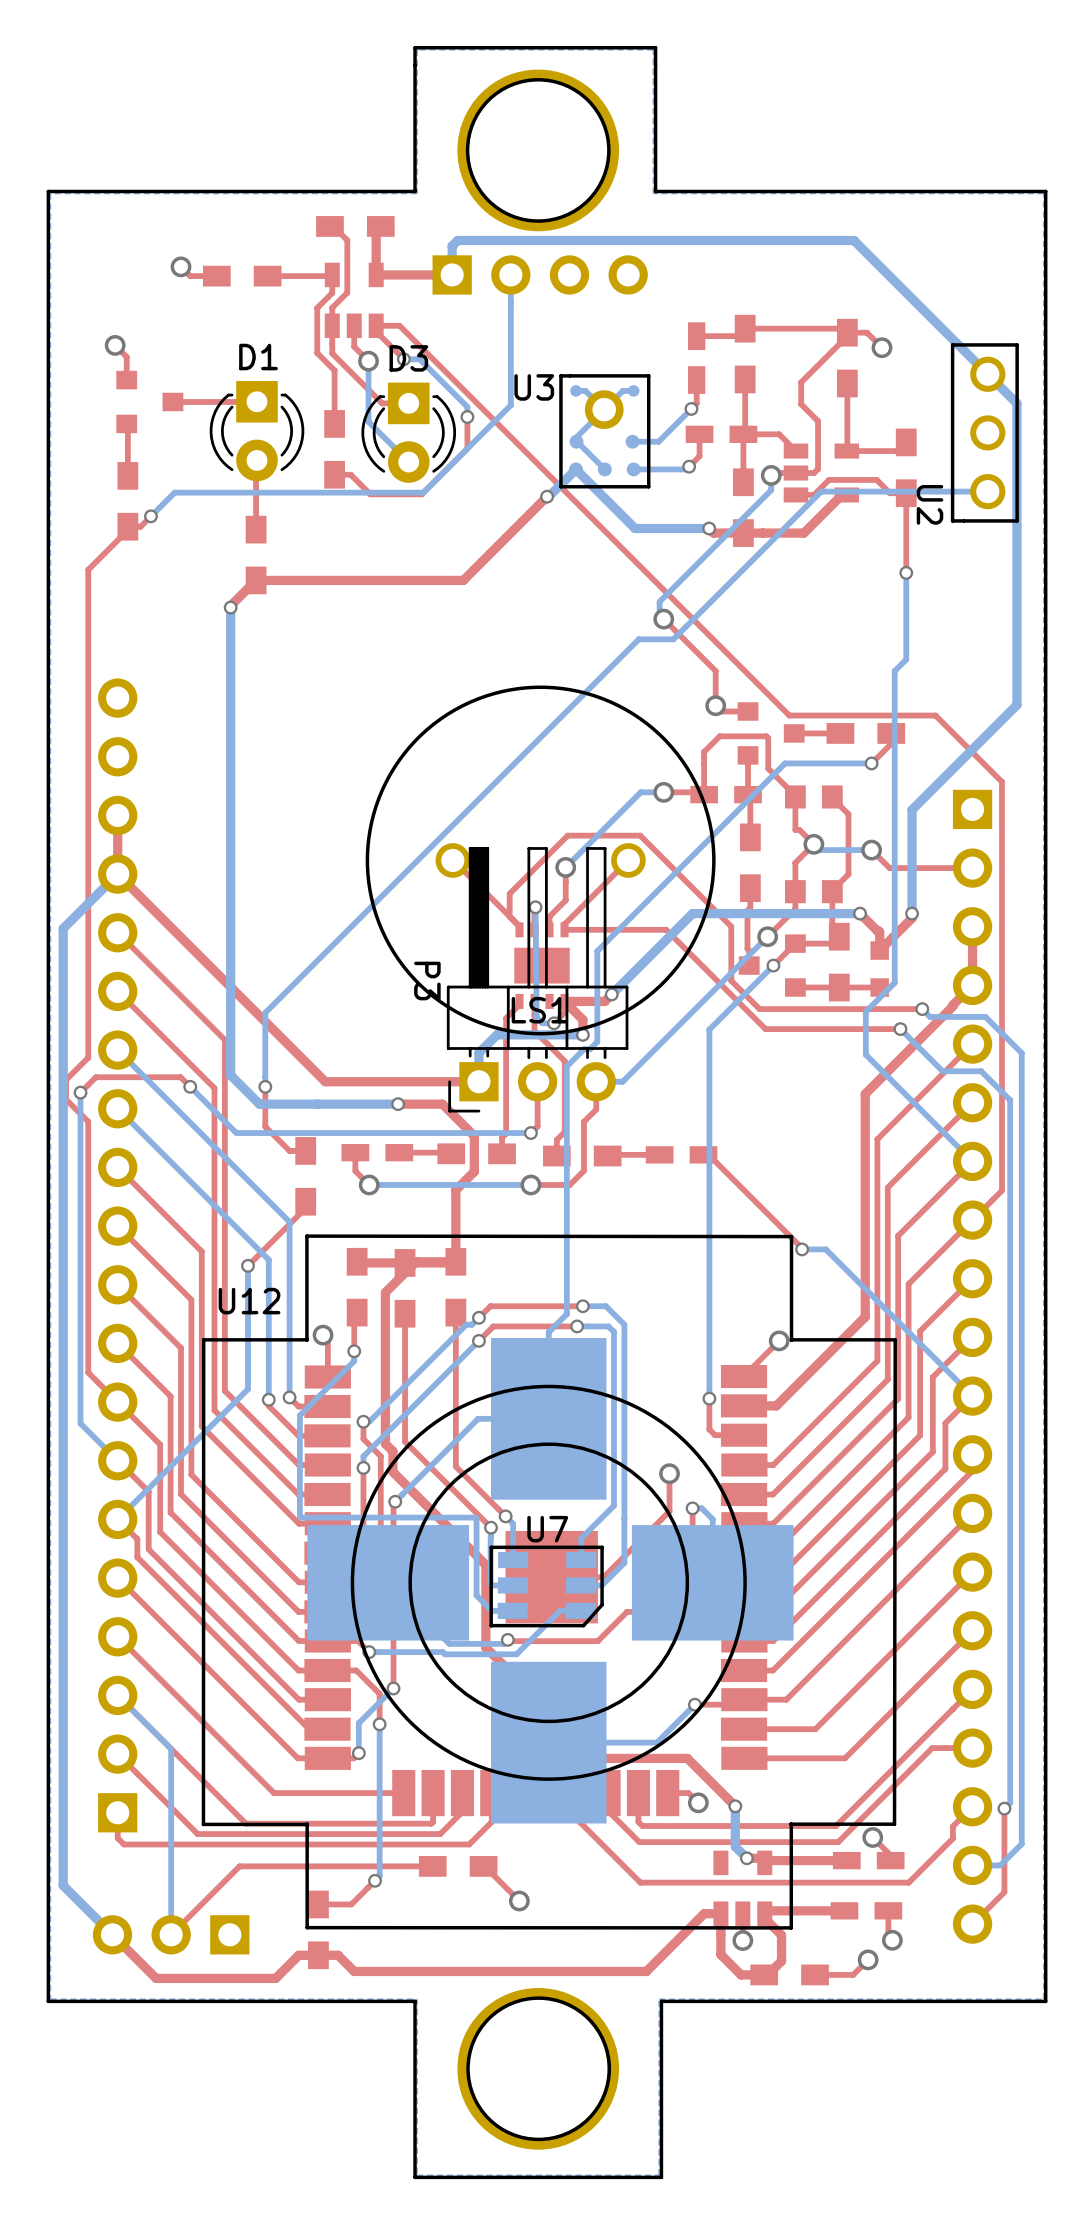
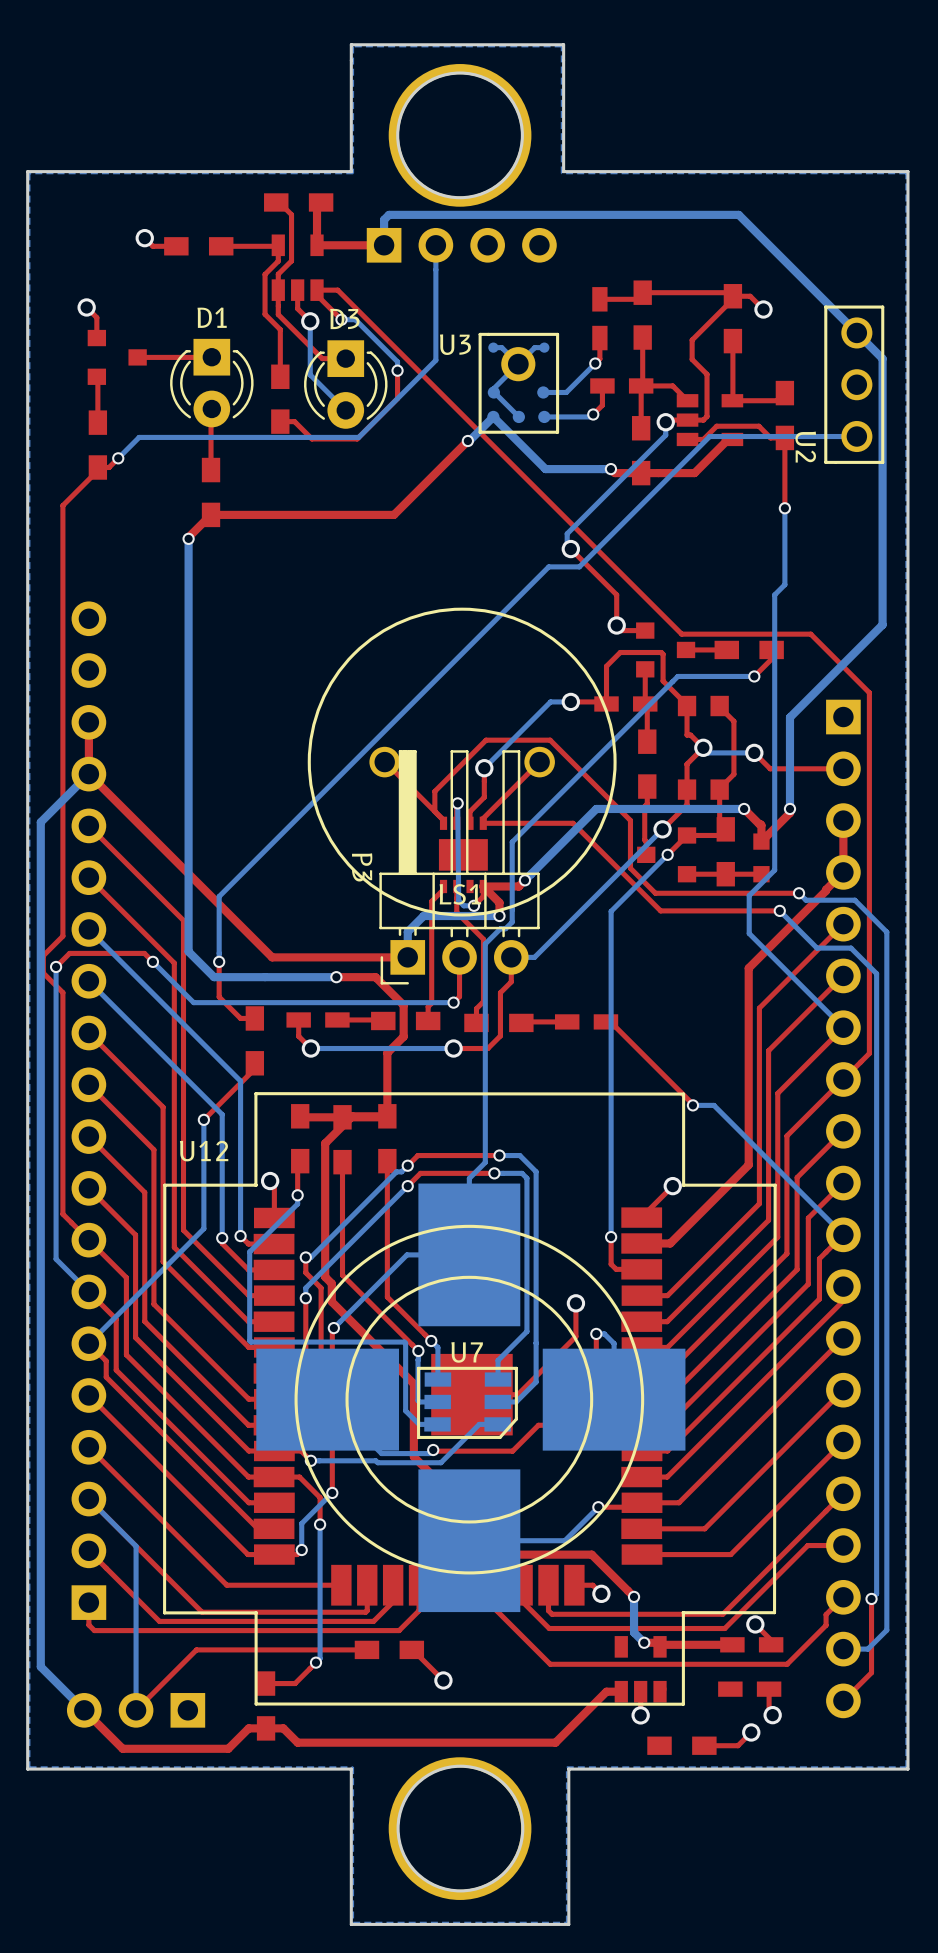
top track: (844, 1910) (767, 1910) -> none
top track: (720, 1913) (720, 1954) (741, 1974) (764, 1974) -> none
top track: (764, 1918) (781, 1935) (781, 1961) (767, 1974) -> none

